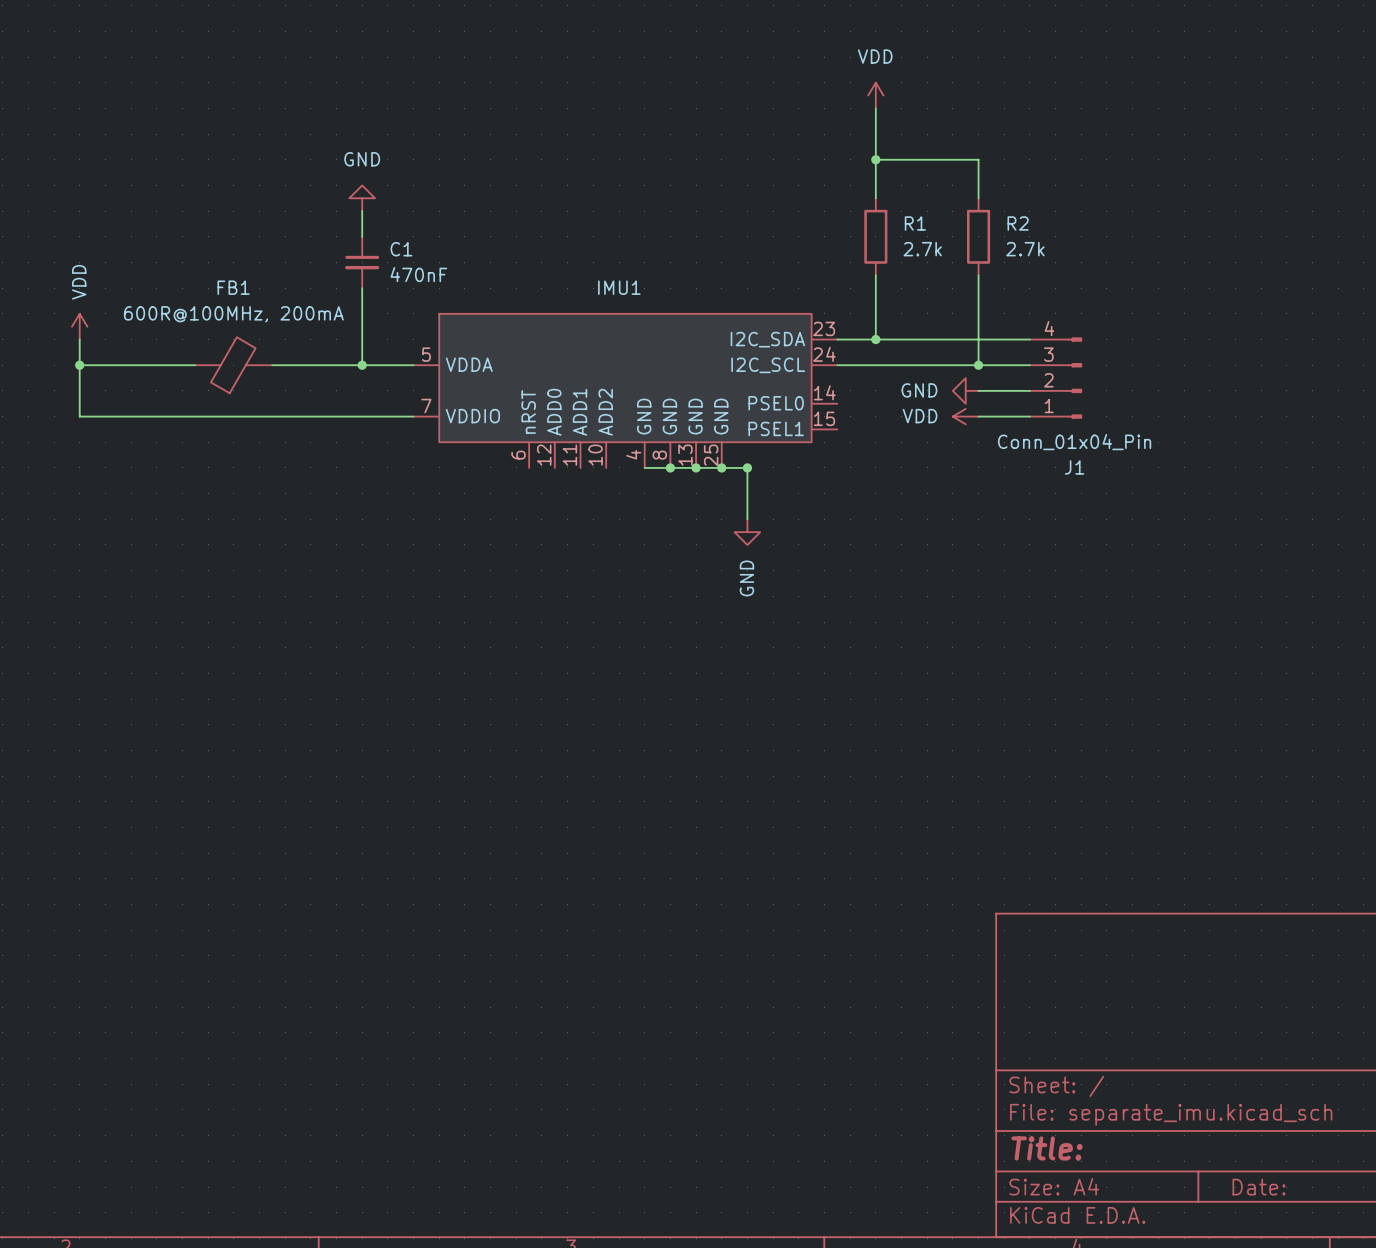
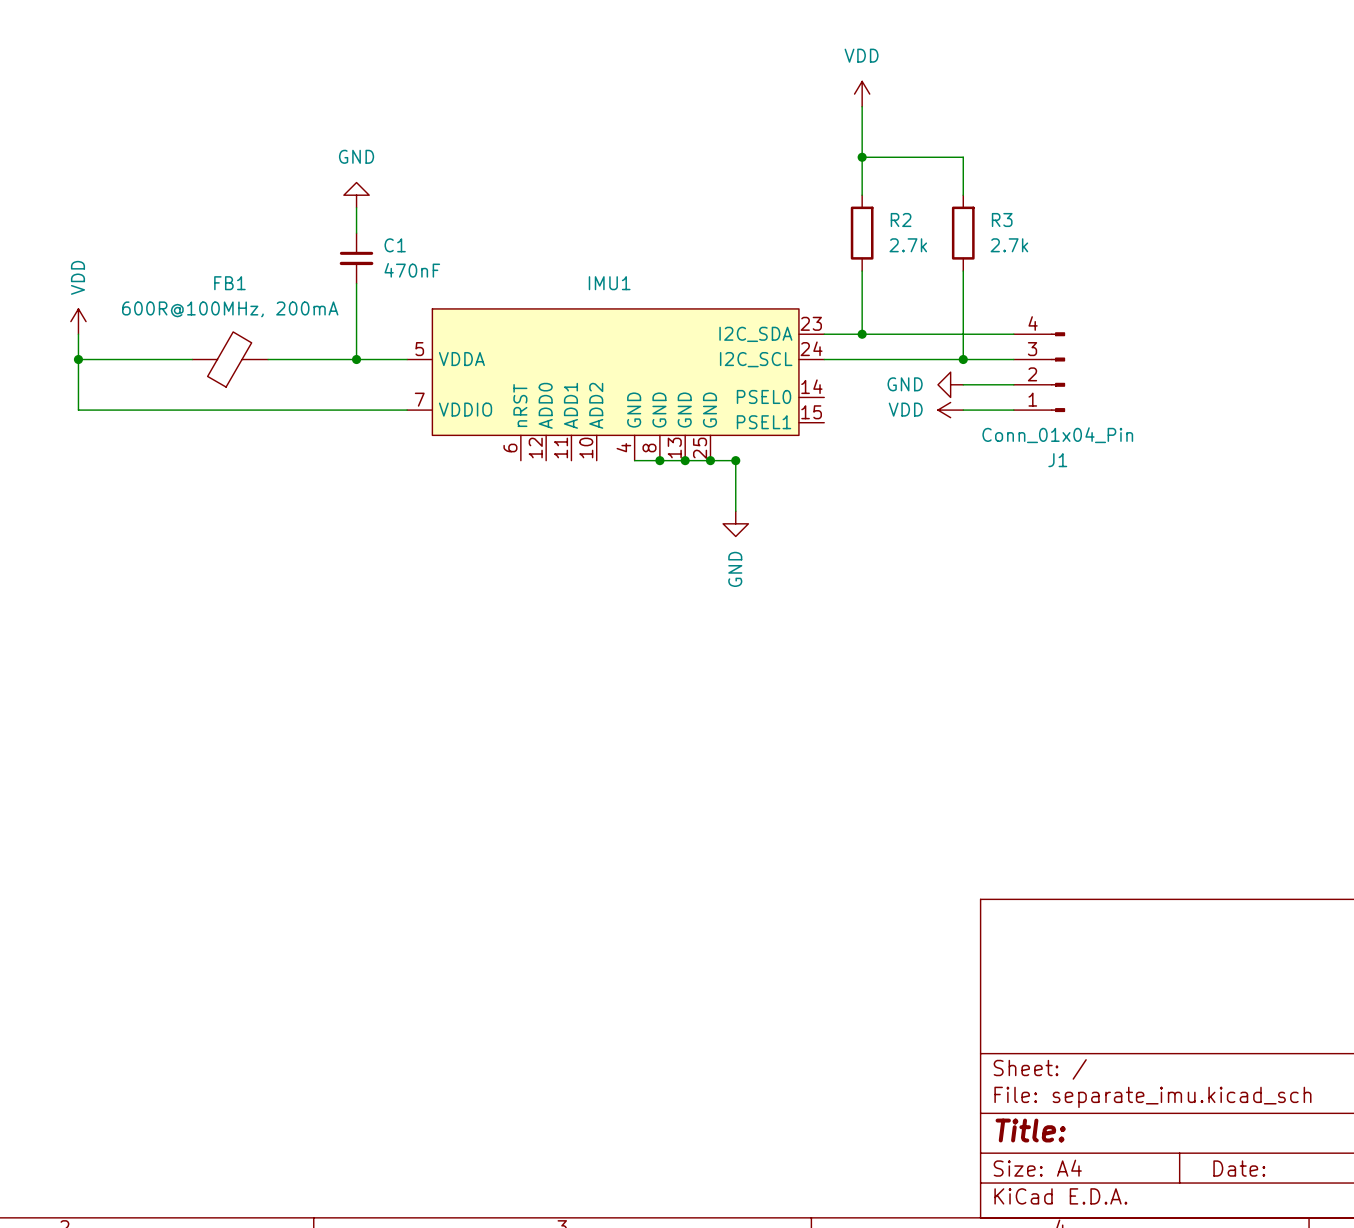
R1 name: R1 (915, 223) -> R2 (901, 220)
R2 name: R2 (1018, 223) -> R3 (1002, 220)

